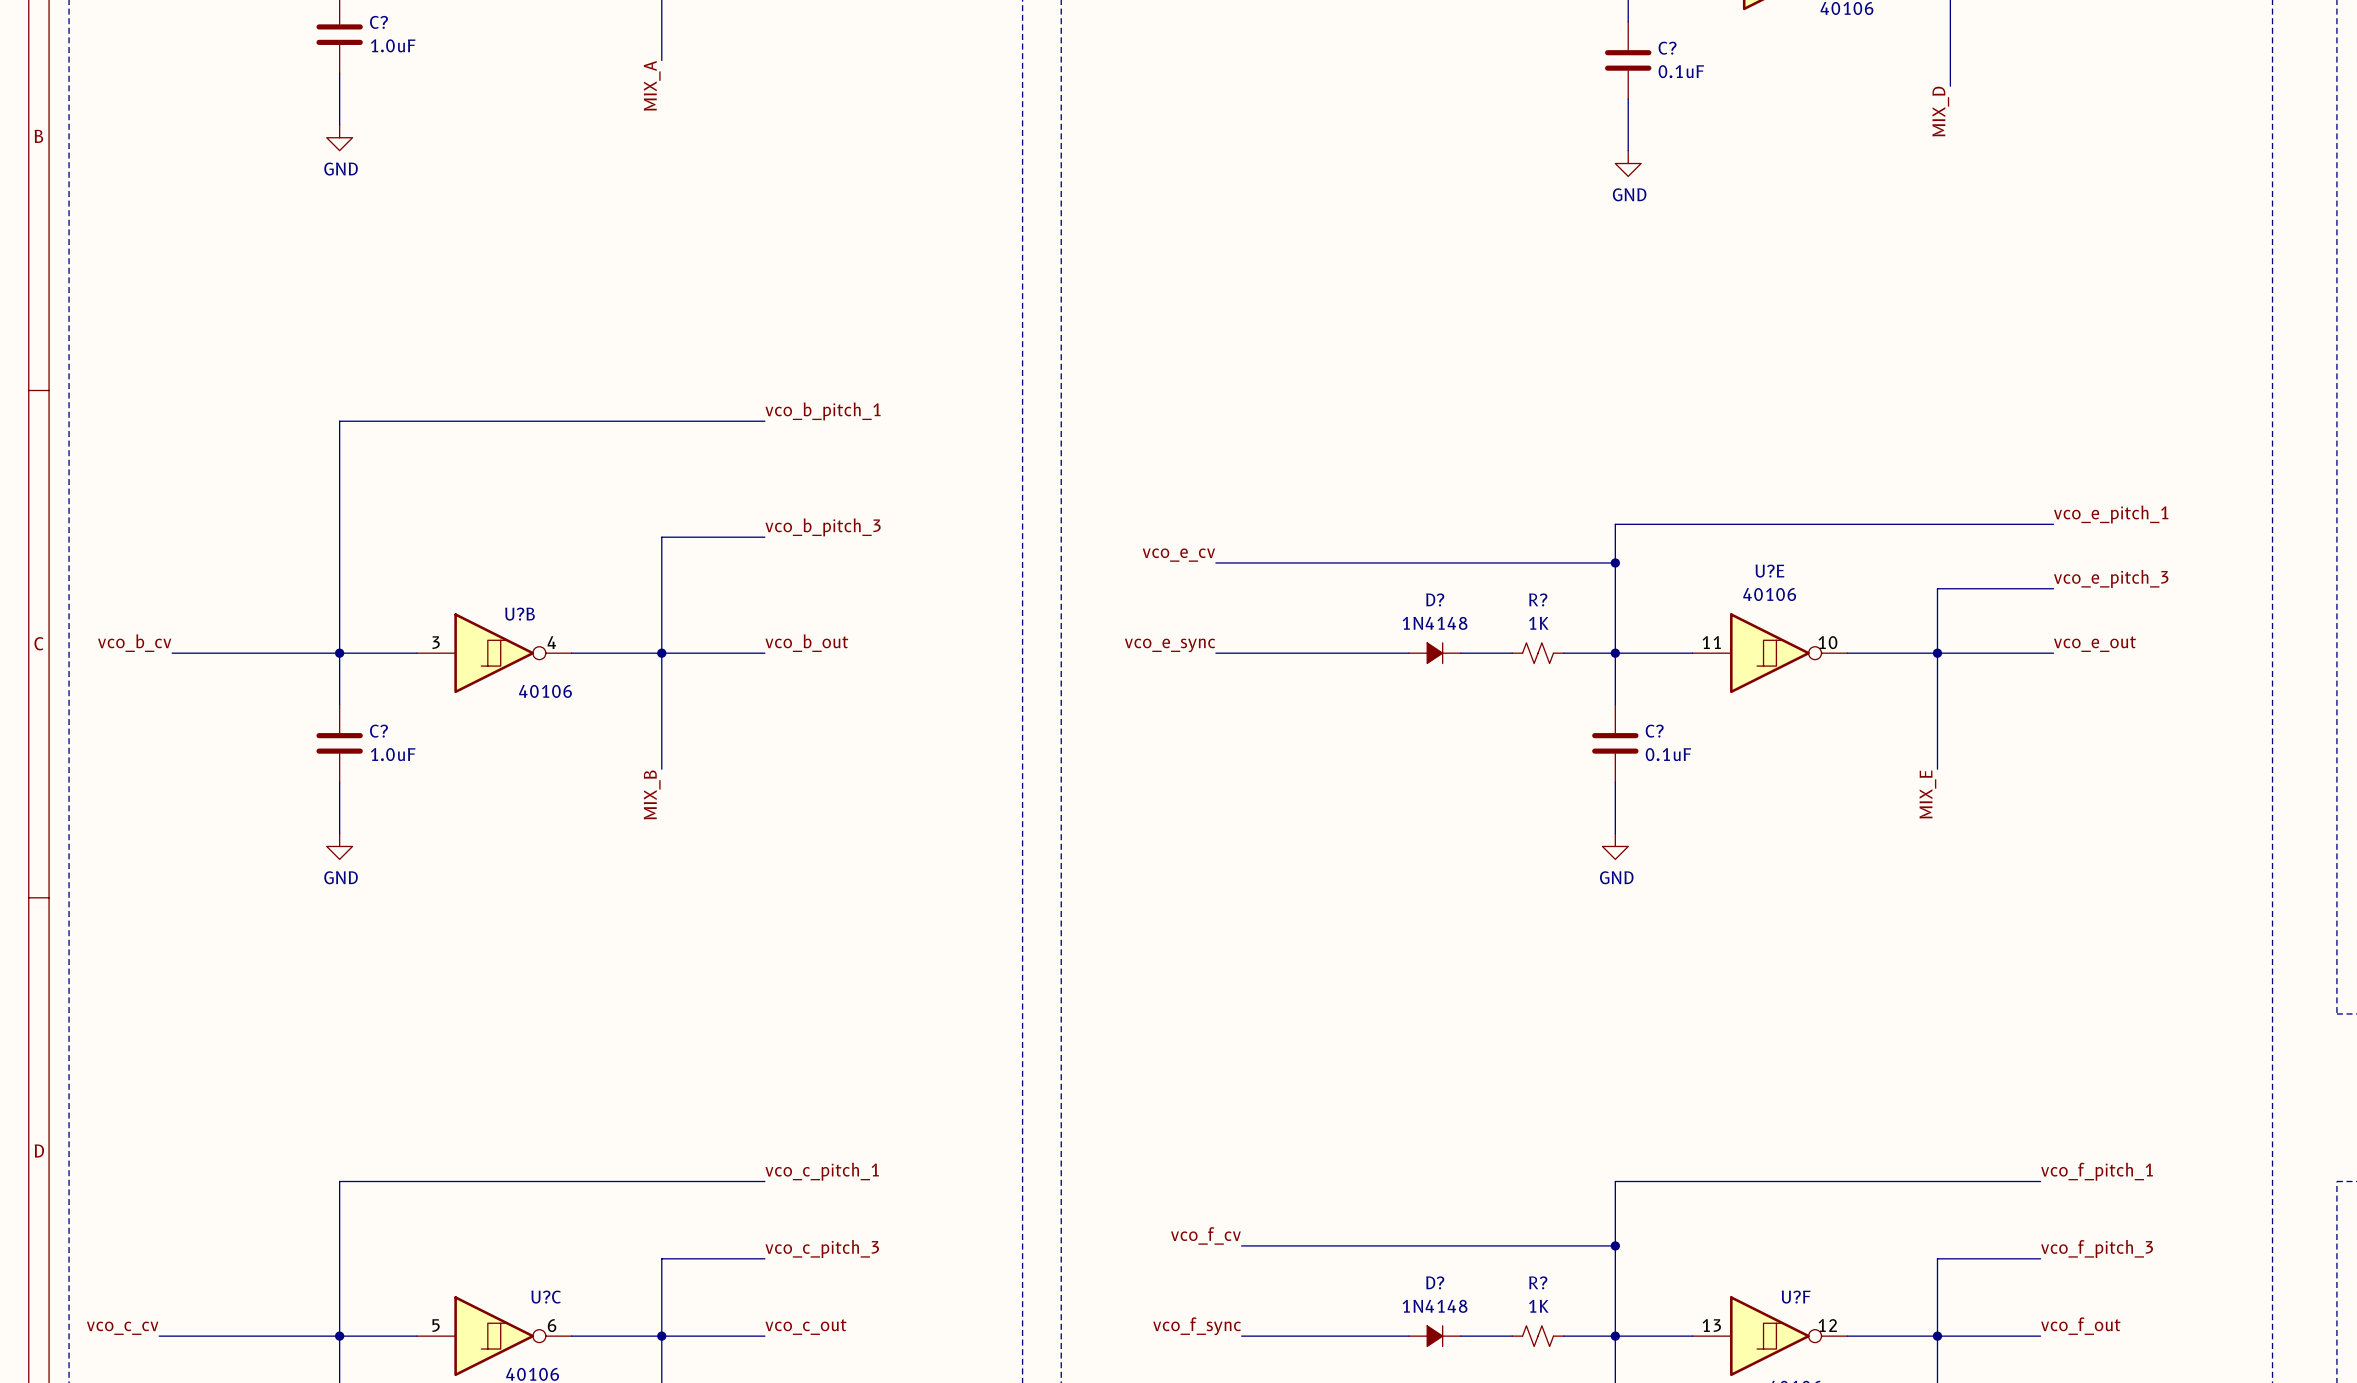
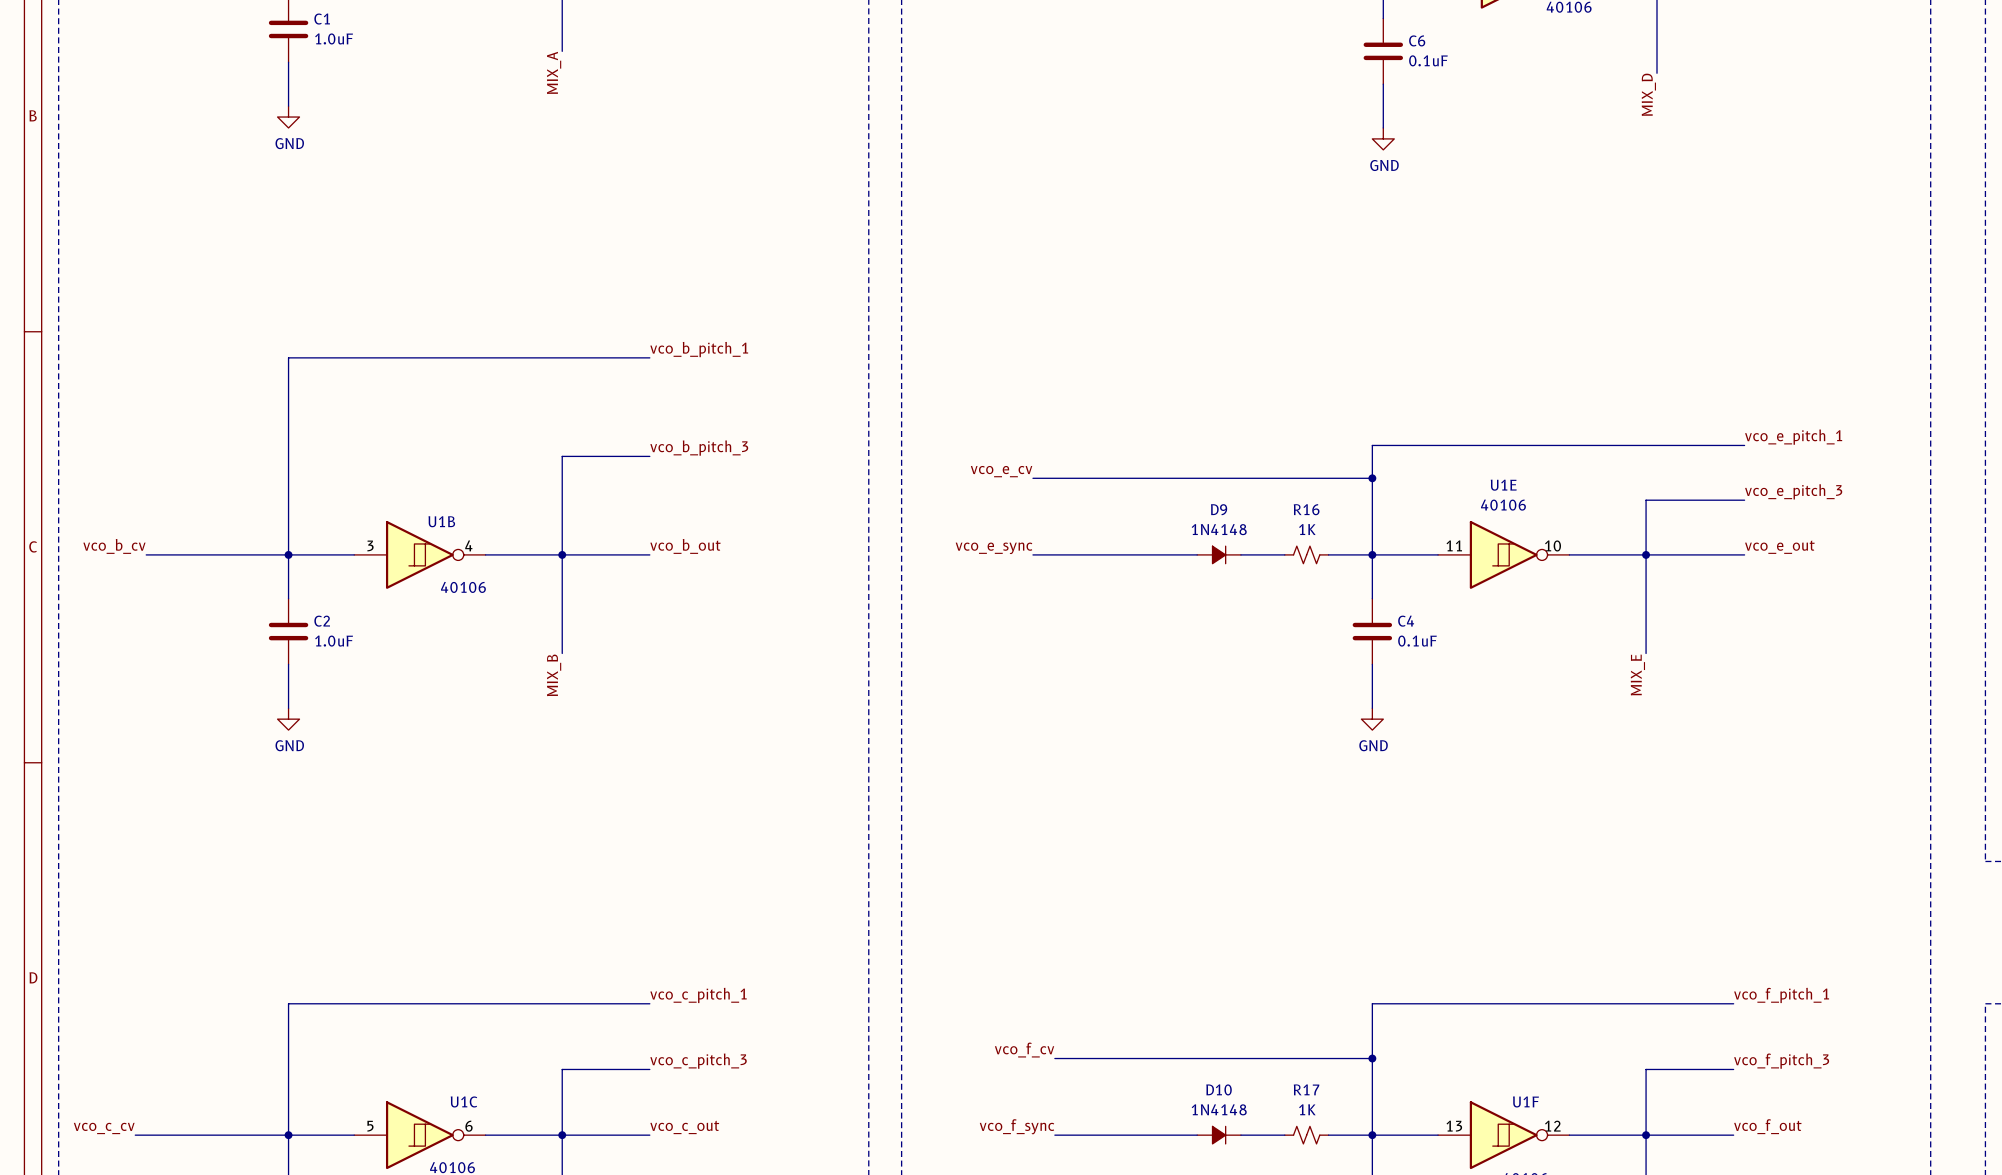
C? name: C? (378, 22) -> C1 (322, 19)
C? name: C? (1667, 48) -> C6 (1417, 40)
U?E name: U?E (1769, 571) -> U1E (1503, 485)
D? name: D? (1435, 599) -> D9 (1219, 509)
R? name: R? (1538, 599) -> R16 (1306, 509)
U?B name: U?B (520, 614) -> U1B (441, 521)
C? name: C? (378, 731) -> C2 (322, 621)
C? name: C? (1654, 731) -> C4 (1406, 621)
D? name: D? (1435, 1282) -> D10 (1219, 1089)
R? name: R? (1538, 1282) -> R17 (1306, 1089)
U?C name: U?C (546, 1297) -> U1C (463, 1101)
U?F name: U?F (1796, 1297) -> U1F (1525, 1101)

